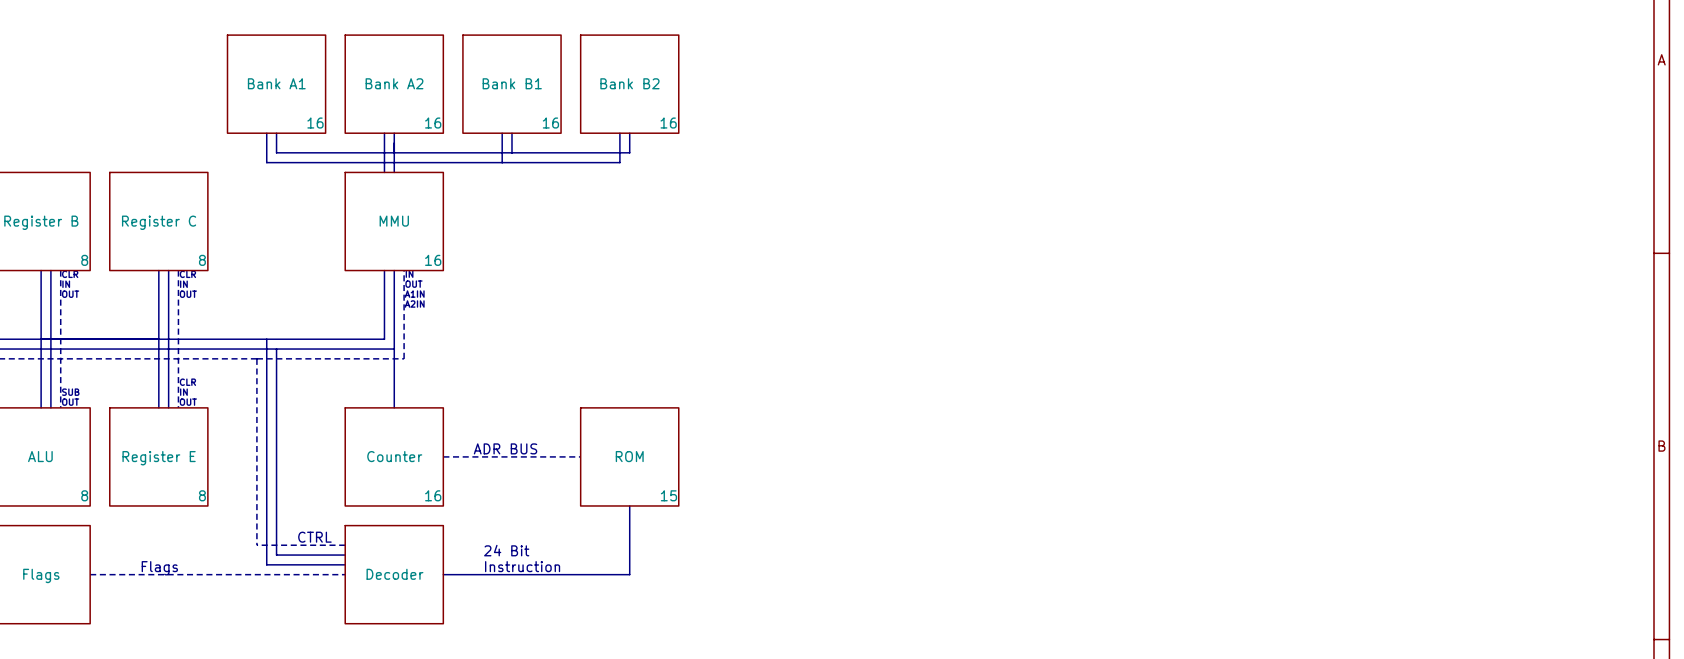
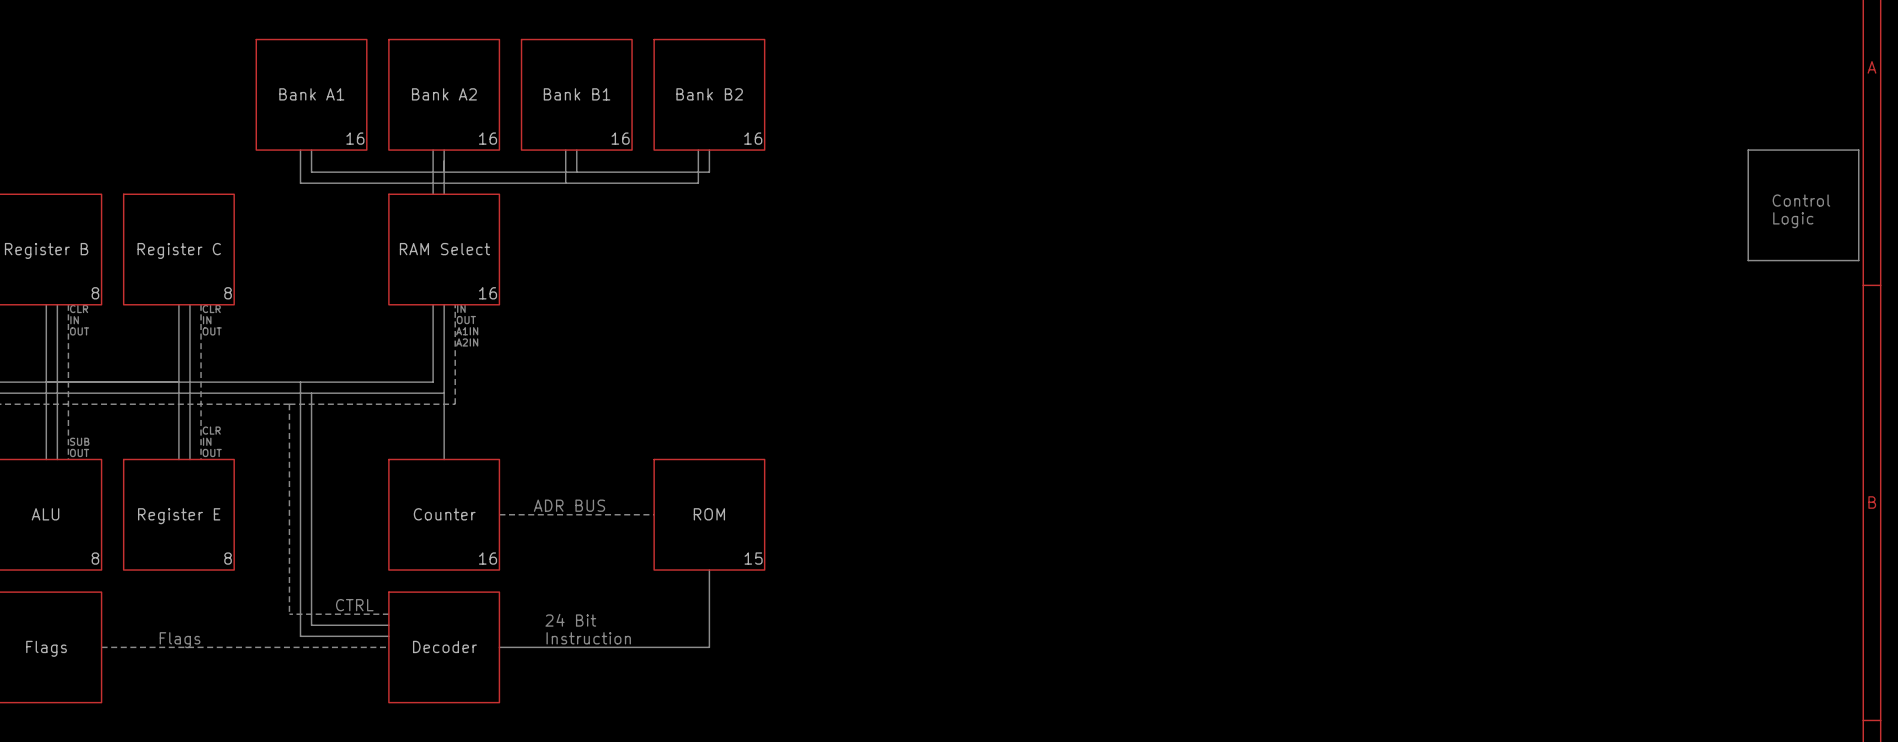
line: none -> (1748, 150) (1748, 260) (1858, 260) (1858, 150) (1748, 150)
text: none -> Control (1801, 200)
text: none -> Logic (1793, 220)
sheet MMU name: MMU (394, 221) -> RAM Select (444, 249)

